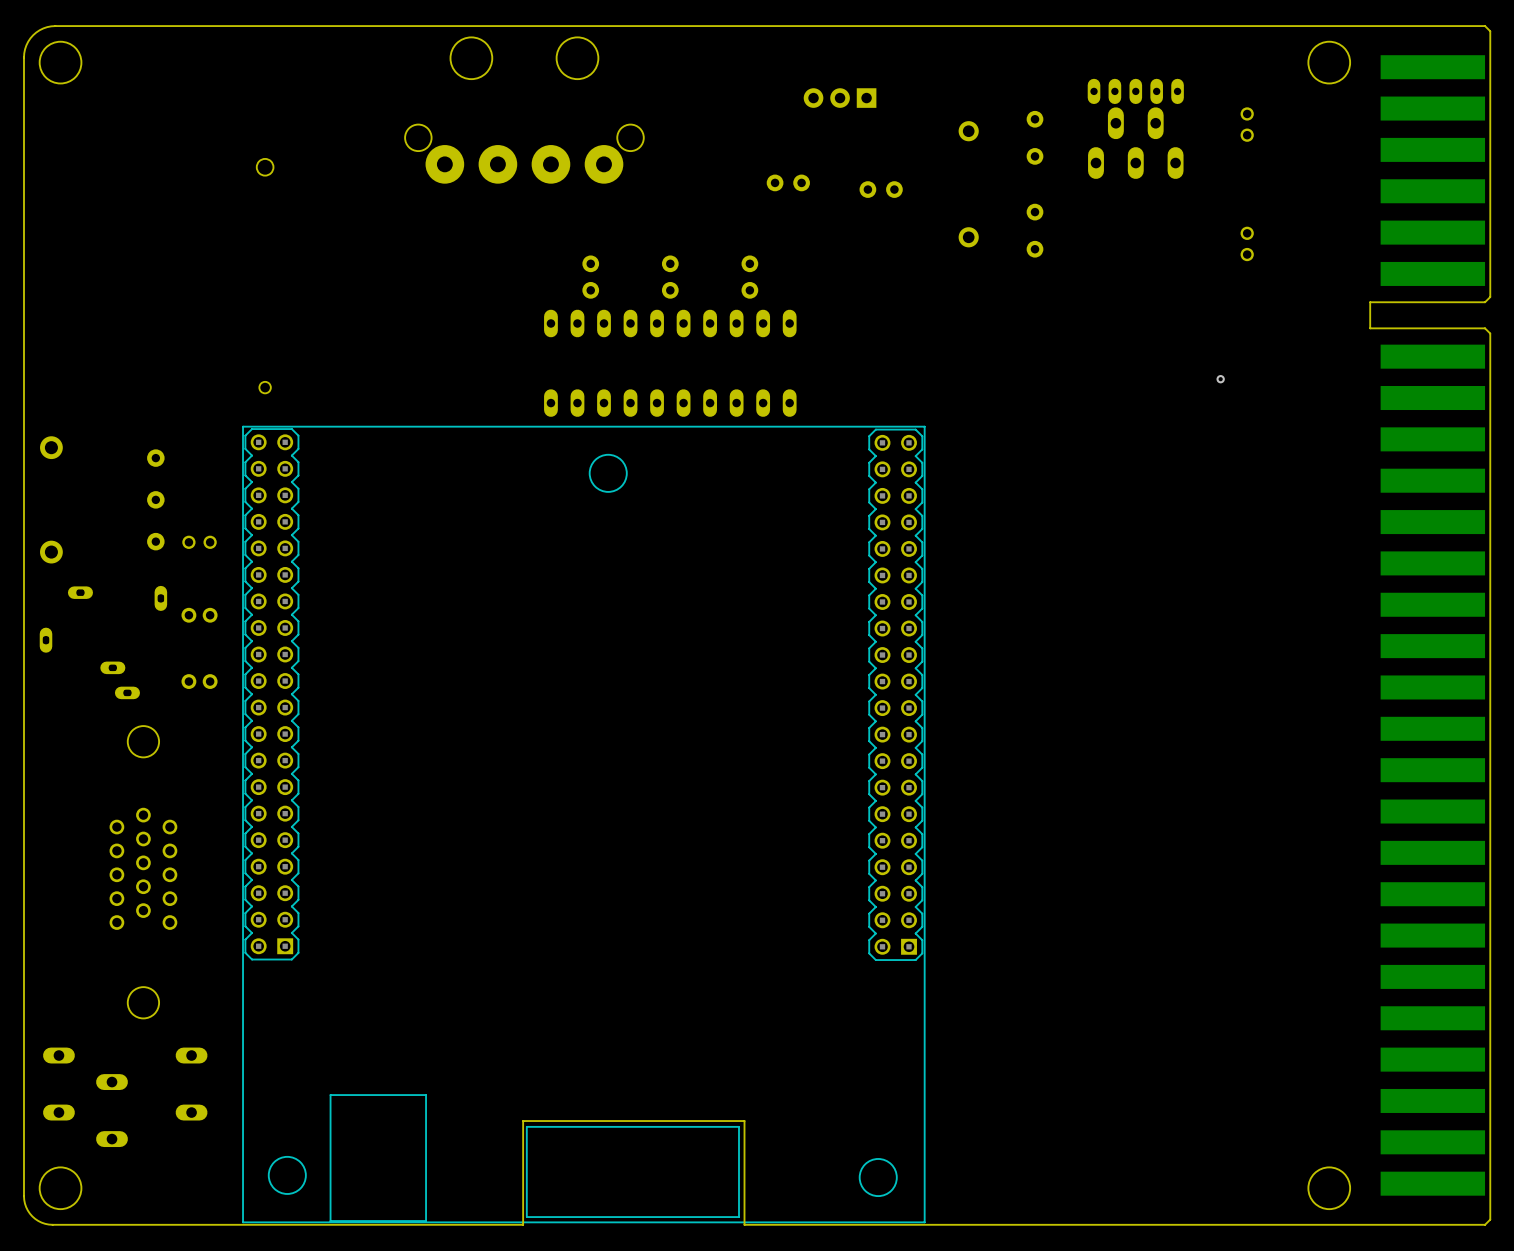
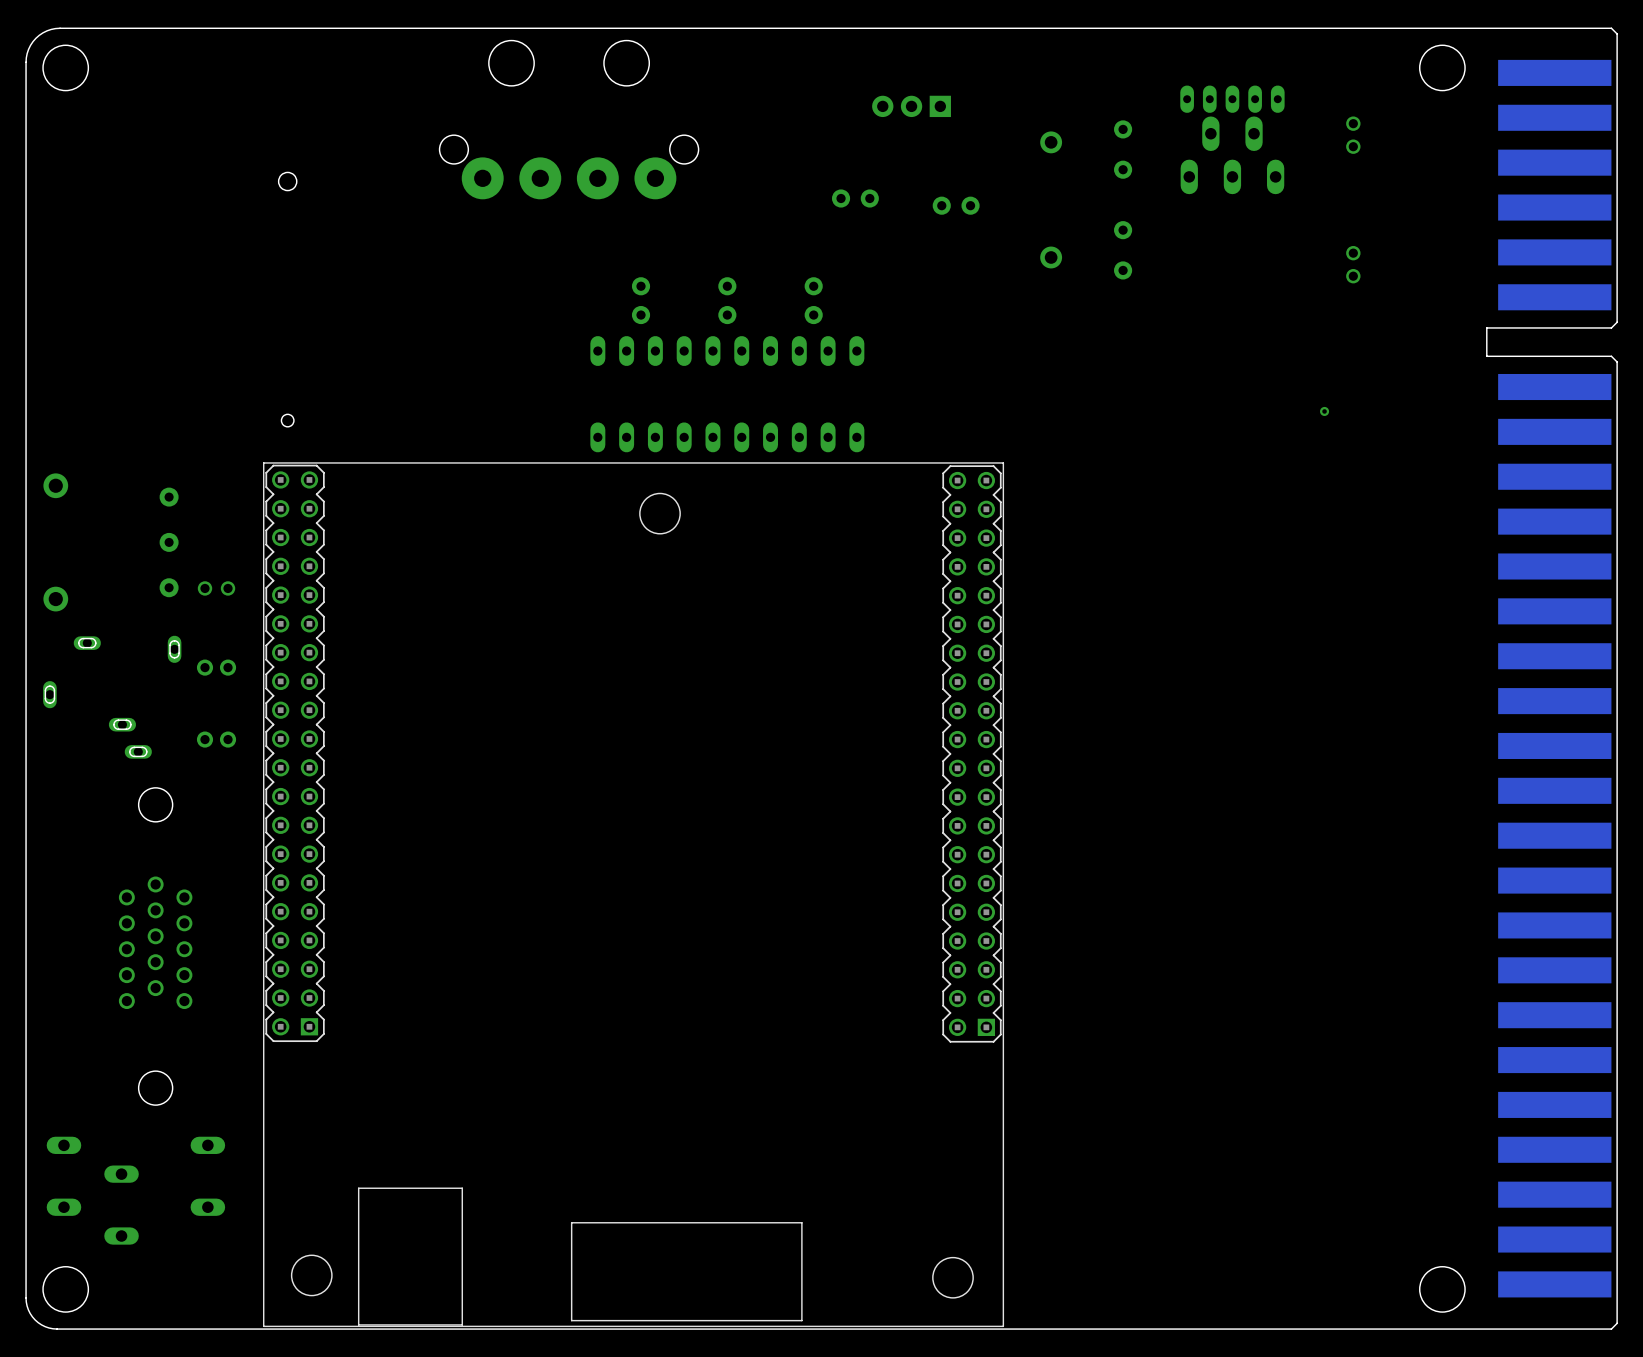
part footprint: [23, 25, 1491, 1226] -> [25, 27, 1618, 1330]

